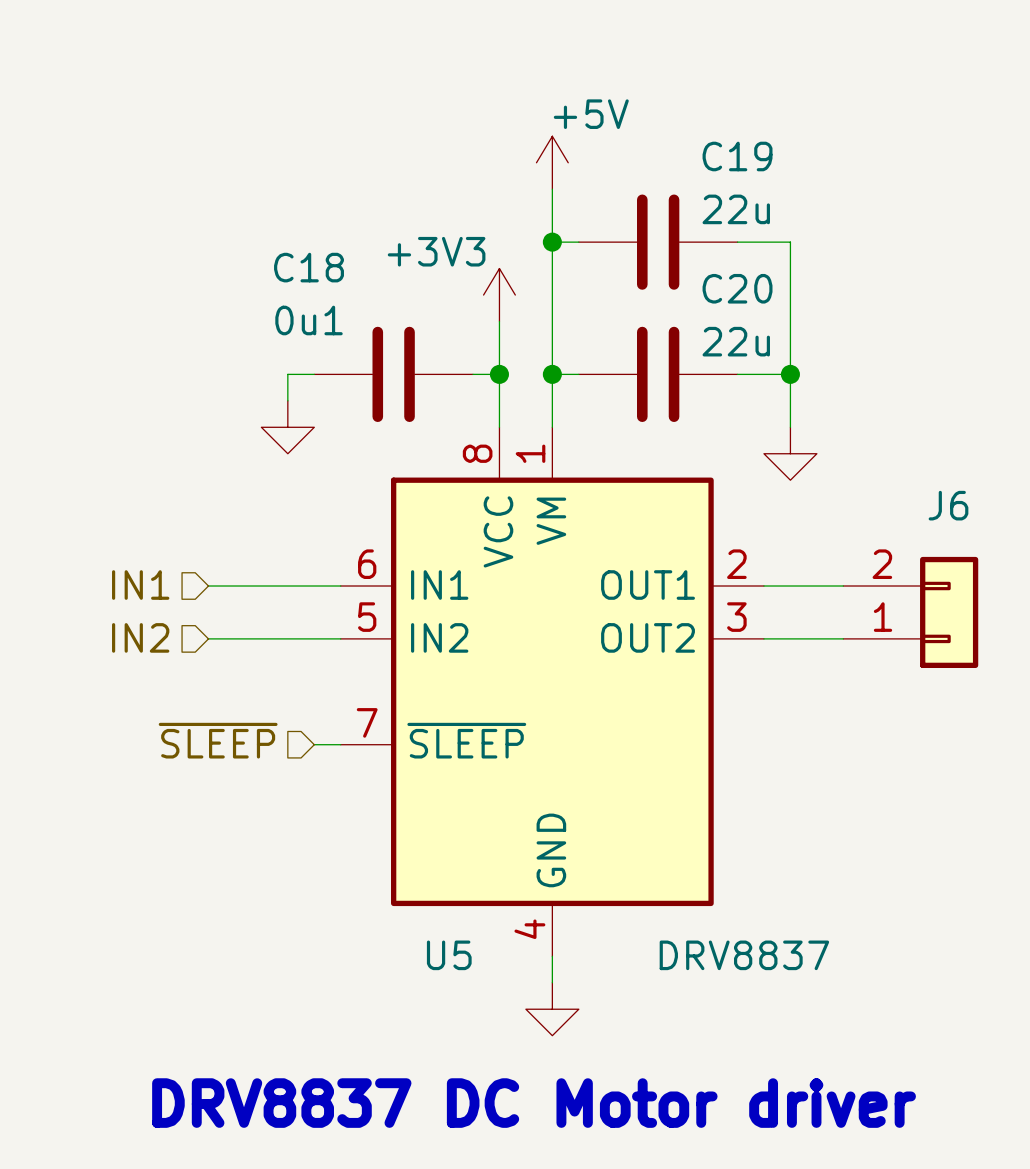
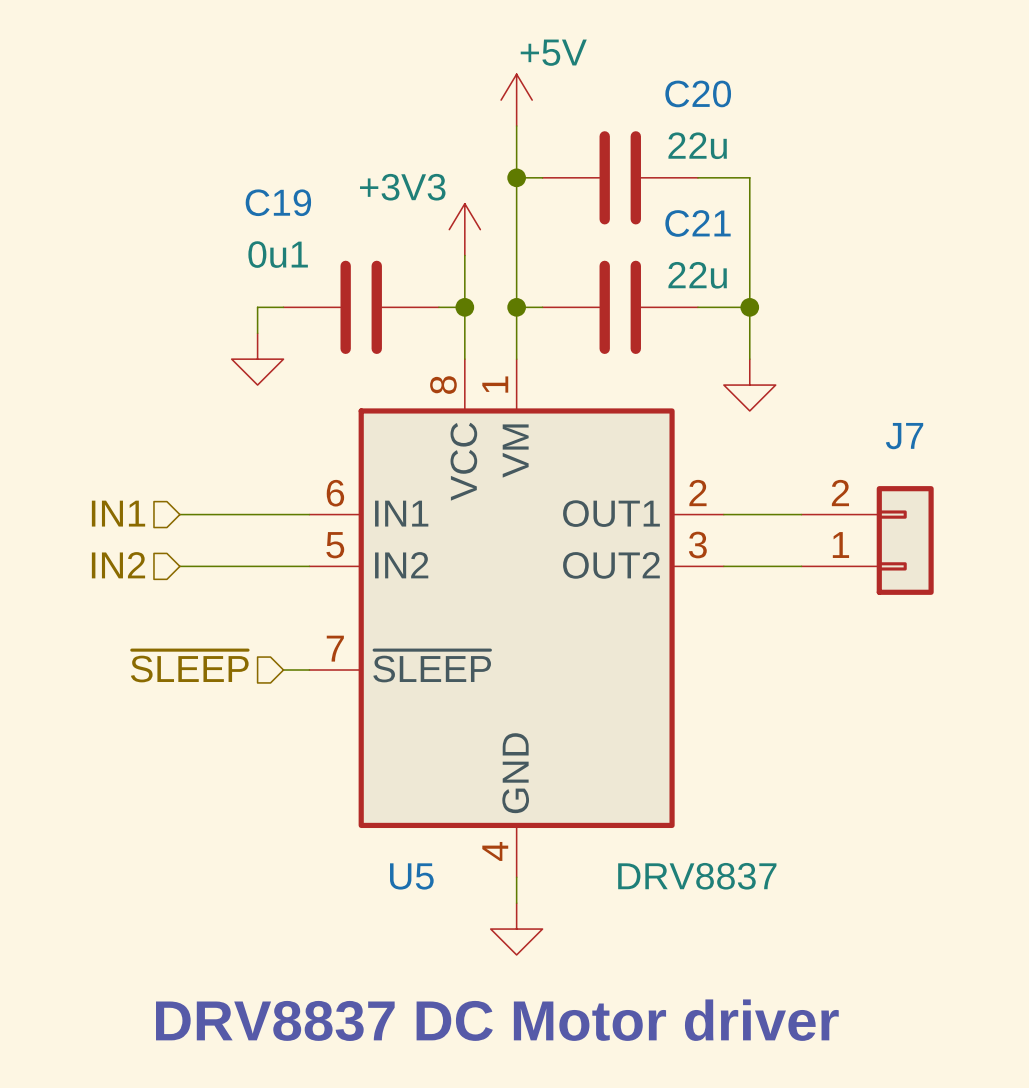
C19 name: C19 (737, 156) -> C20 (698, 93)
C18 name: C18 (309, 267) -> C19 (278, 202)
C20 name: C20 (737, 288) -> C21 (698, 223)
J6 name: J6 (948, 505) -> J7 (904, 436)

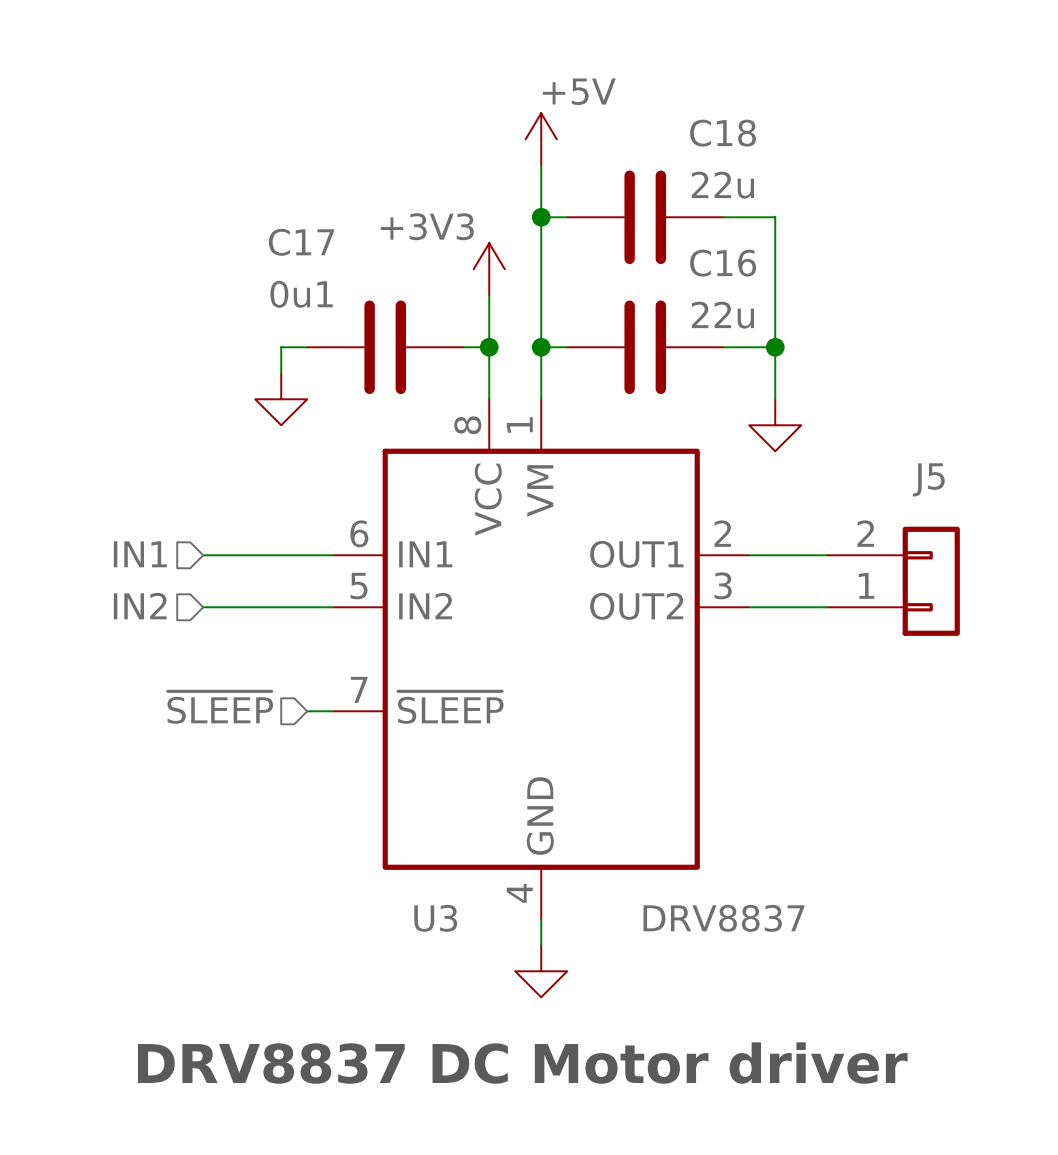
C20 name: C20 (698, 93) -> C18 (723, 133)
C19 name: C19 (278, 202) -> C17 (301, 242)
C21 name: C21 (698, 223) -> C16 (723, 263)
J7 name: J7 (904, 436) -> J5 (928, 479)
U5 name: U5 (411, 876) -> U3 (435, 918)

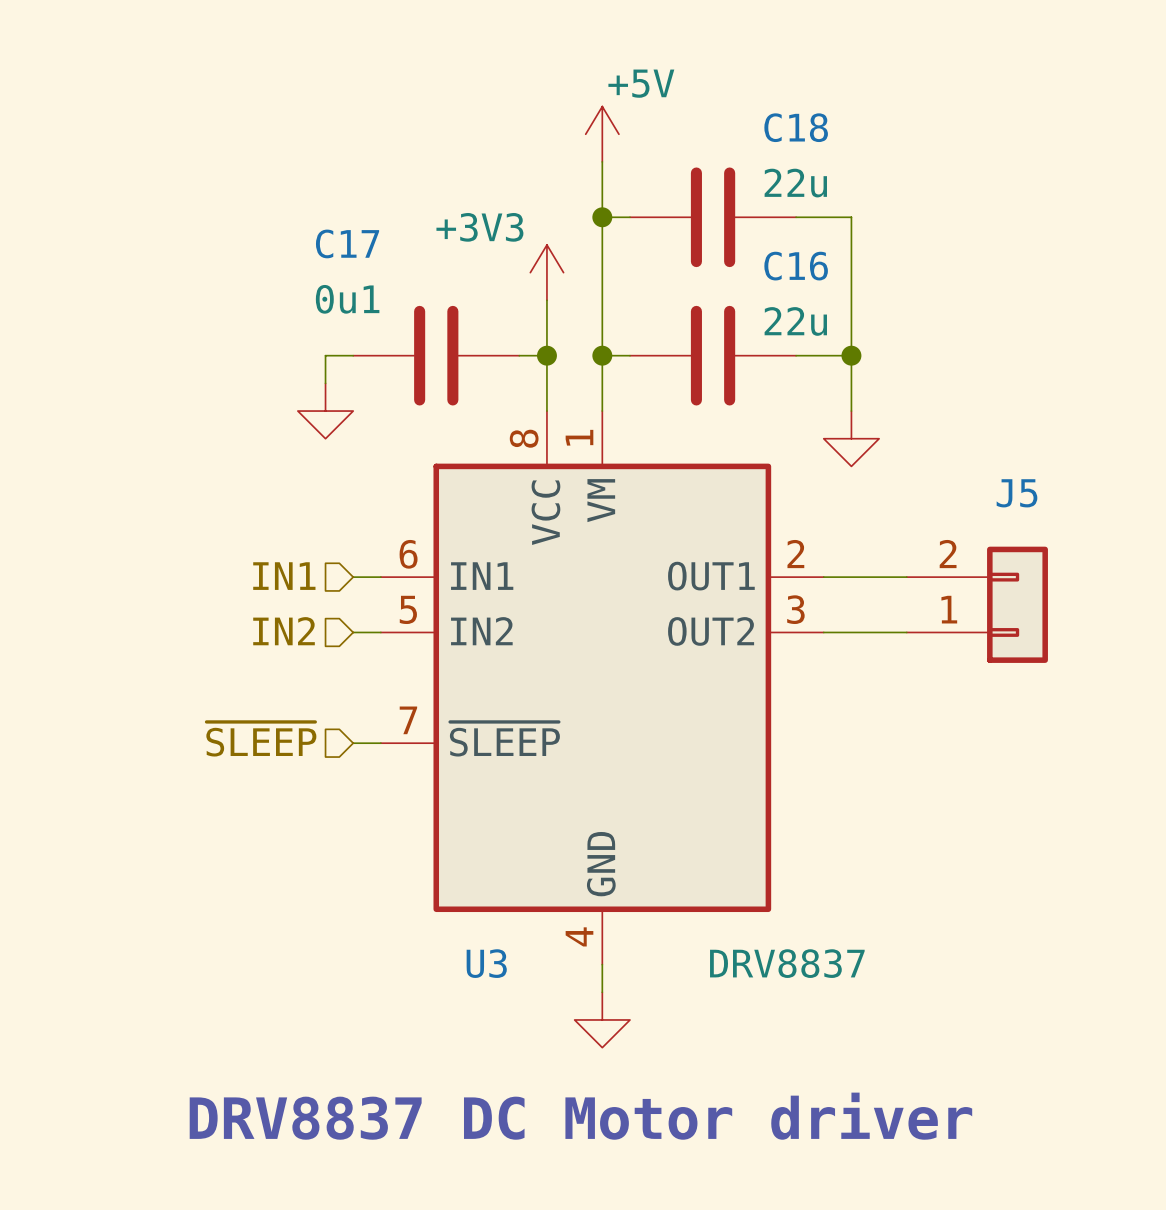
hierarchical label position: IN1 (140, 554) -> IN1 (284, 576)
wire: (203, 555) (307, 555) -> none
hierarchical label position: IN2 (140, 606) -> IN2 (284, 631)
wire: (203, 607) (307, 607) -> none

